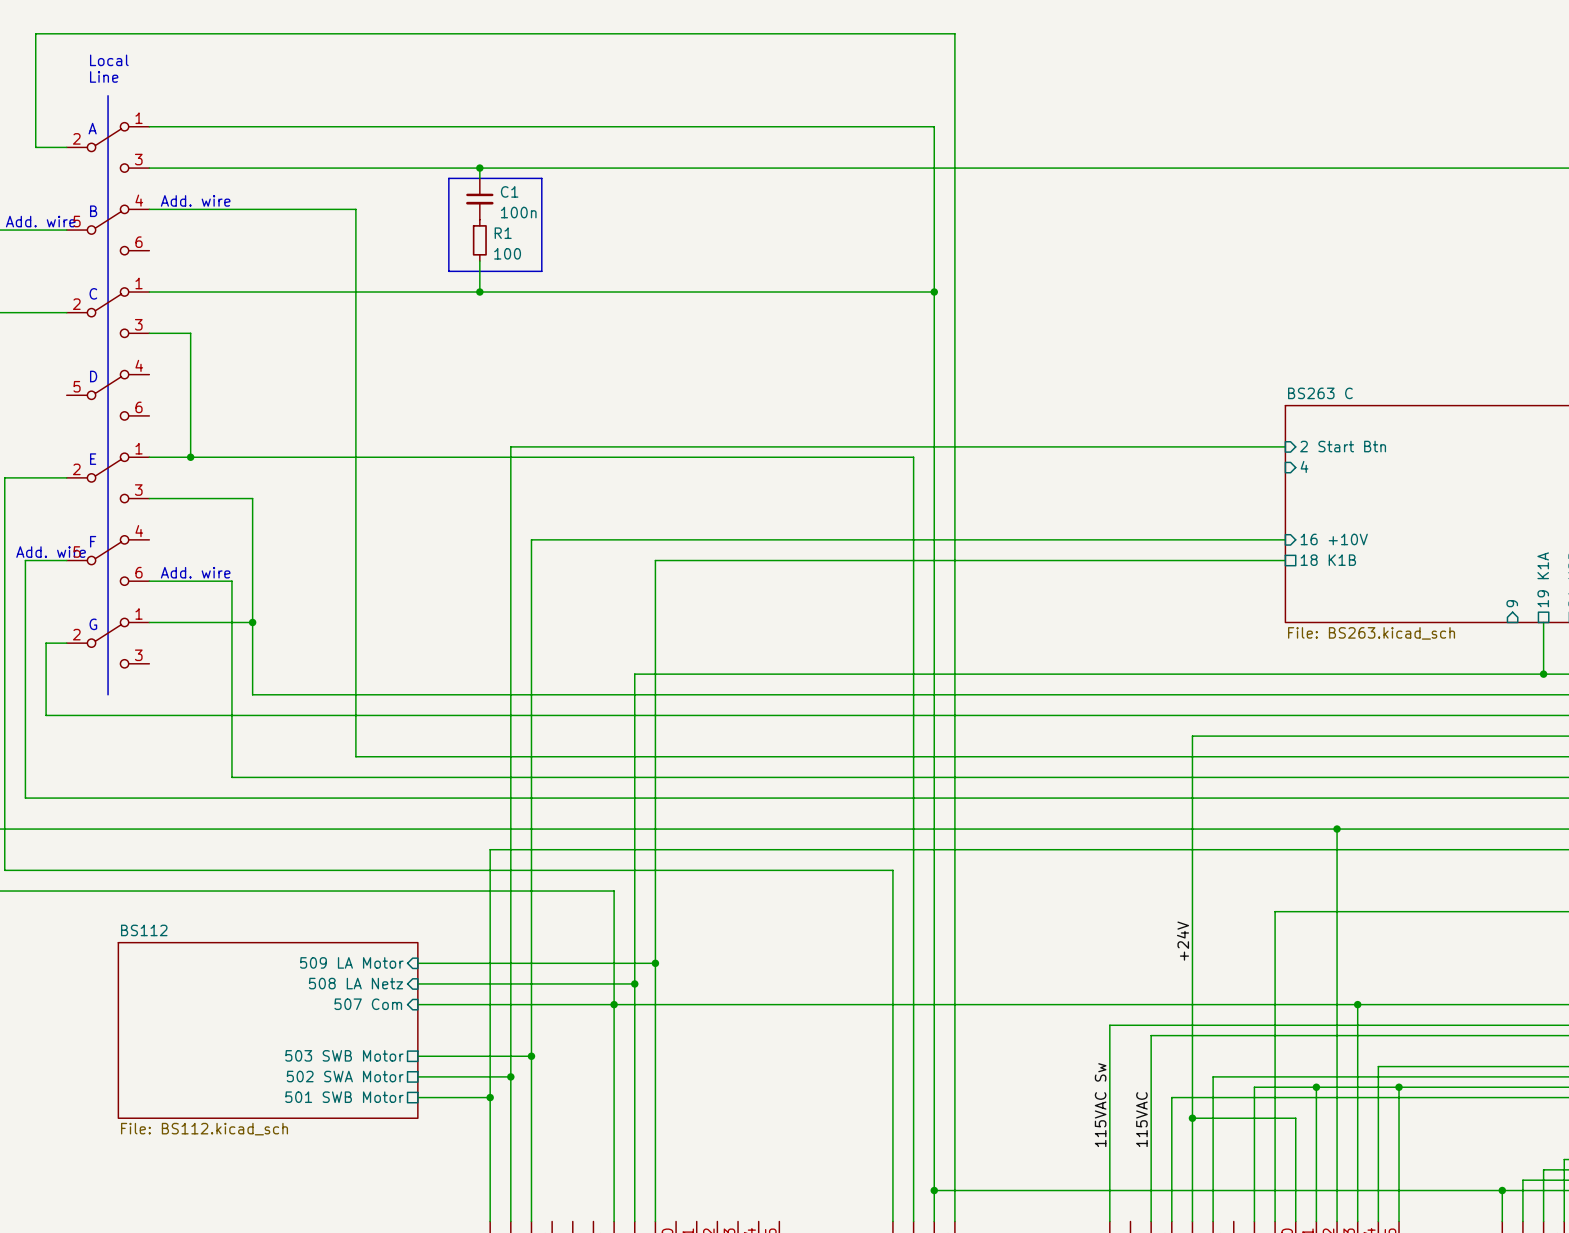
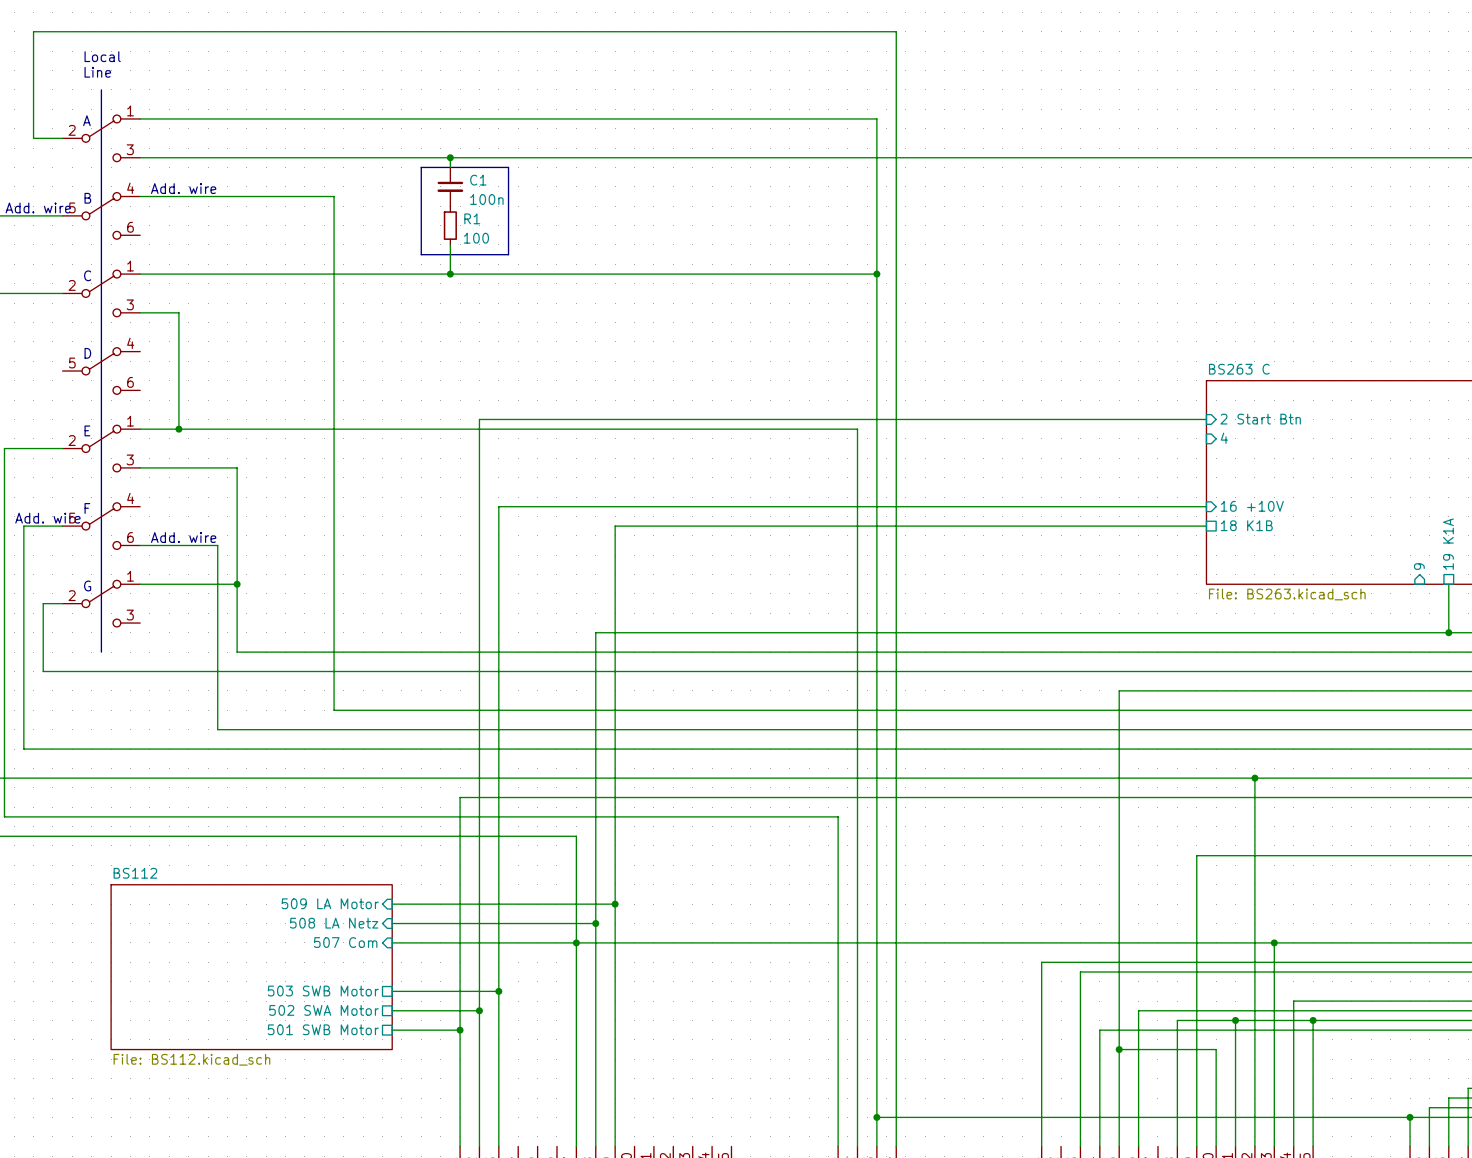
label: +24V (1182, 941) -> none
label: 115VAC Sw (1100, 1105) -> none
label: 115VAC (1141, 1119) -> none

